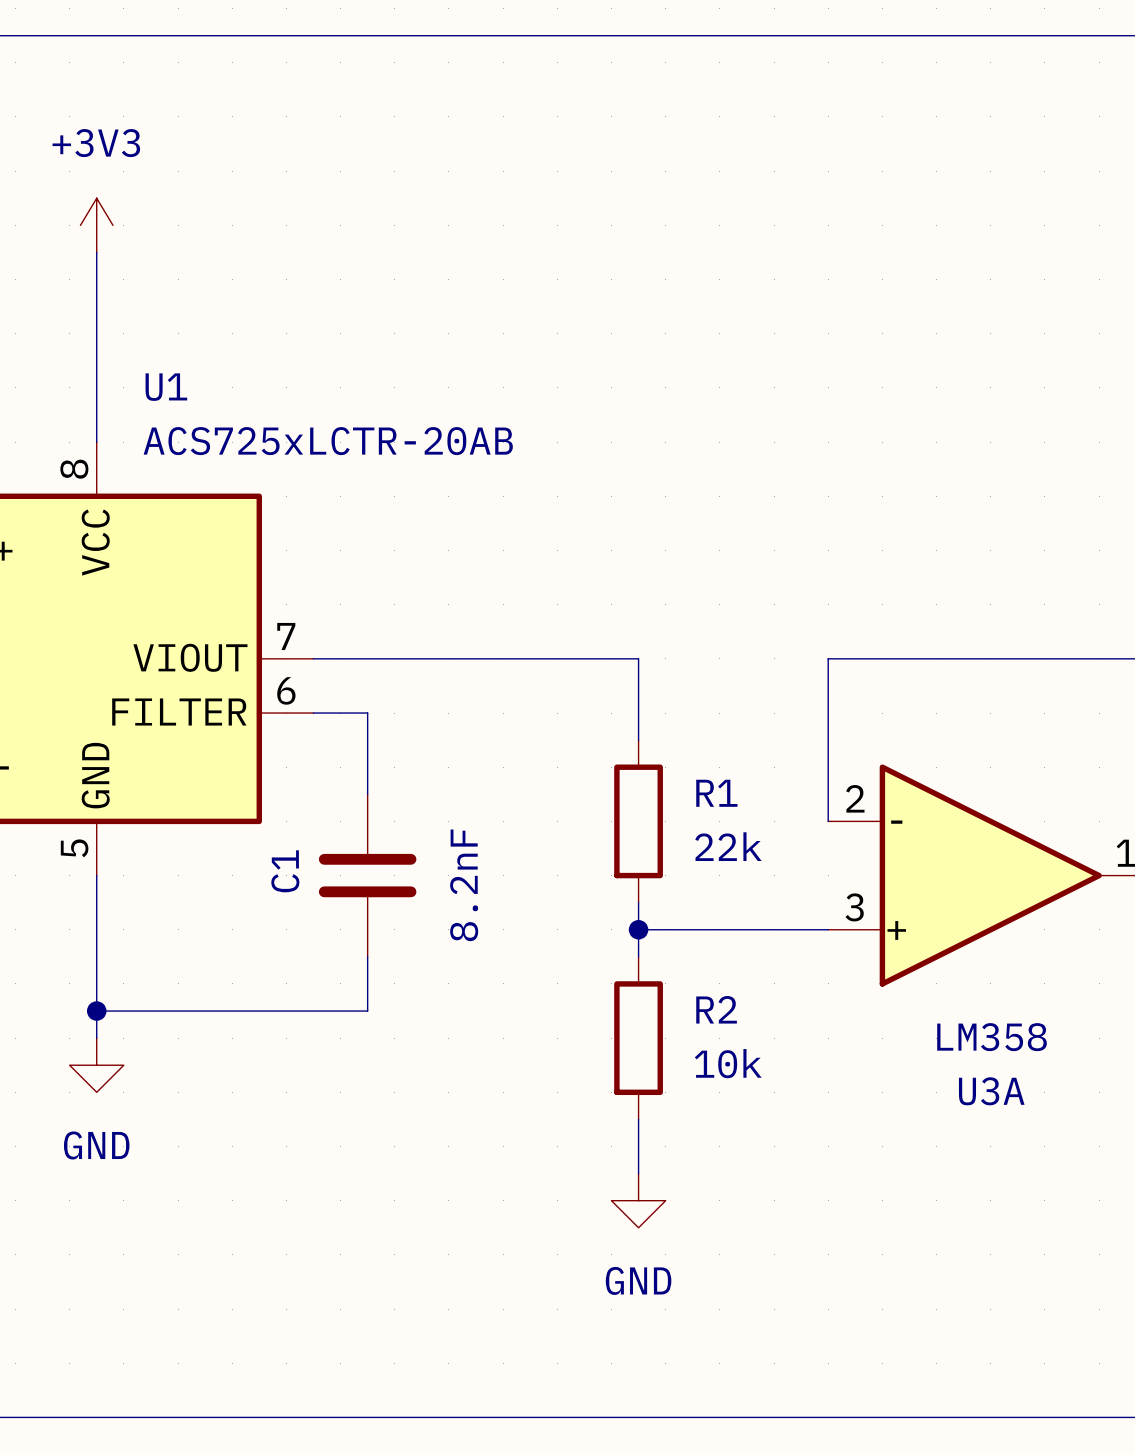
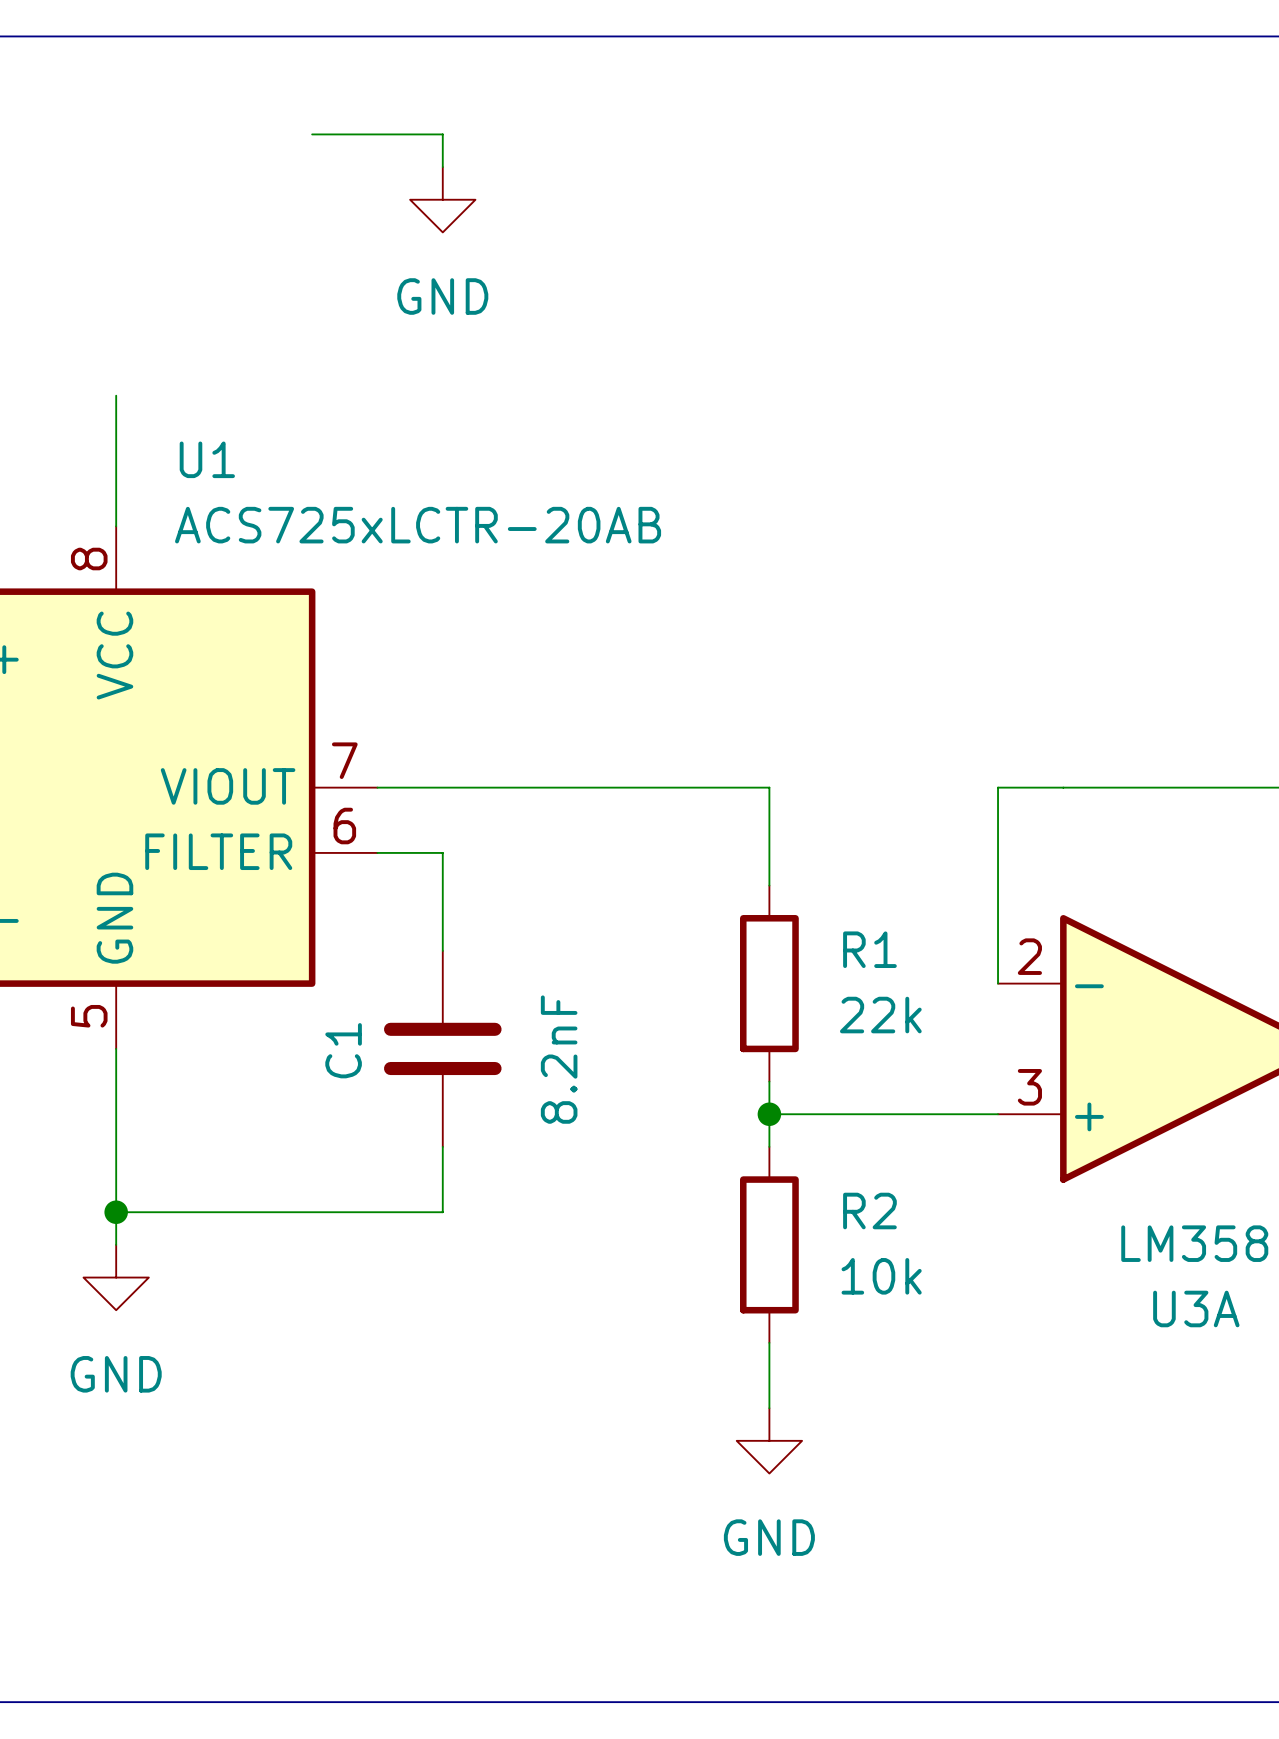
wire: none -> (312, 134) (442, 134) (442, 167)
power symbol: none -> GND (442, 199)
power symbol: +3V3 (96, 225) -> none
wire: (96, 252) (96, 333) -> none

